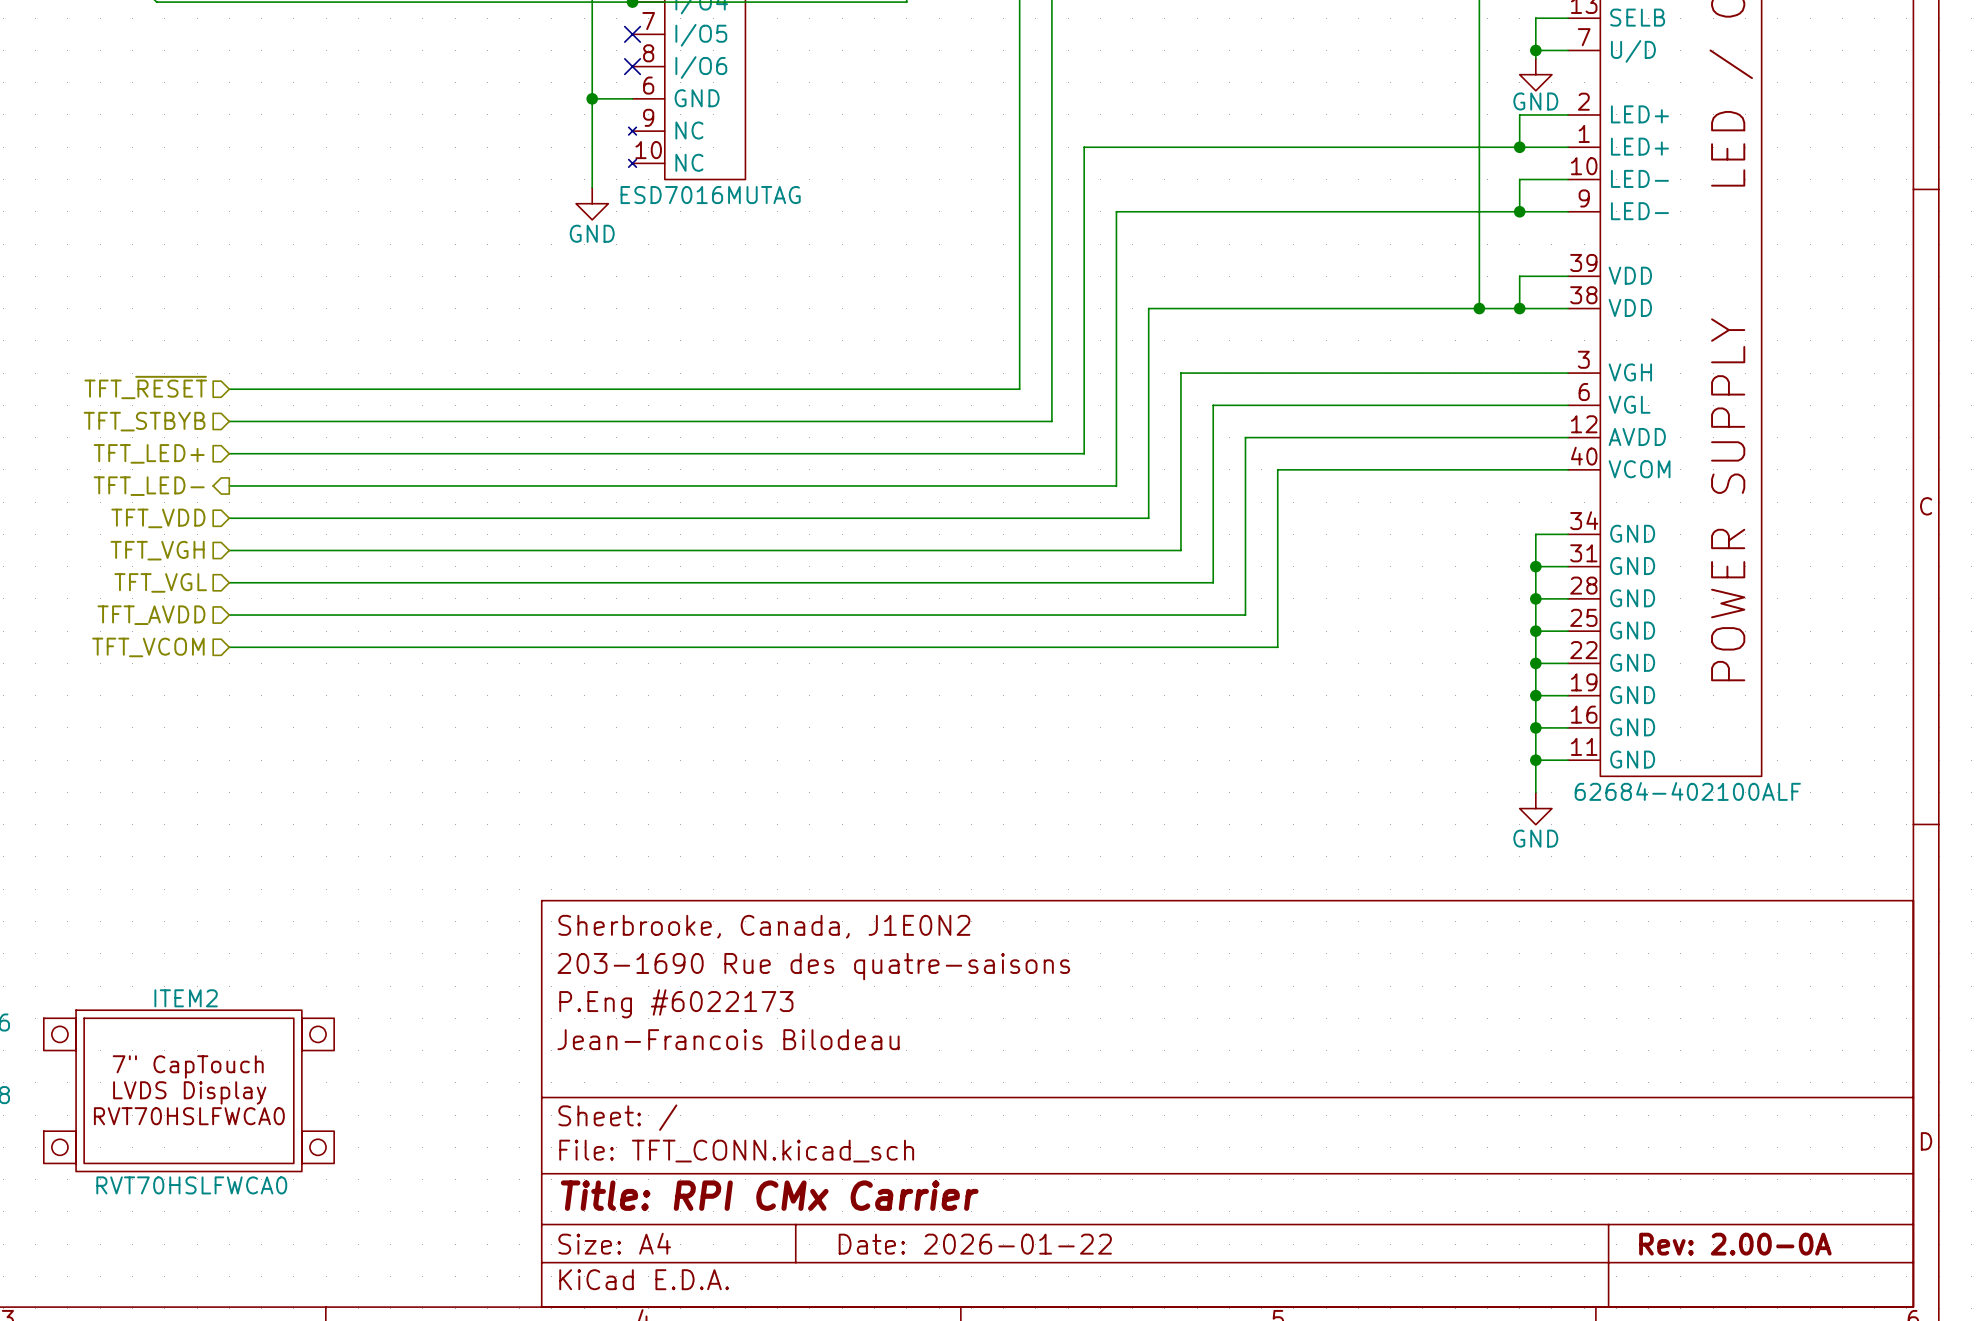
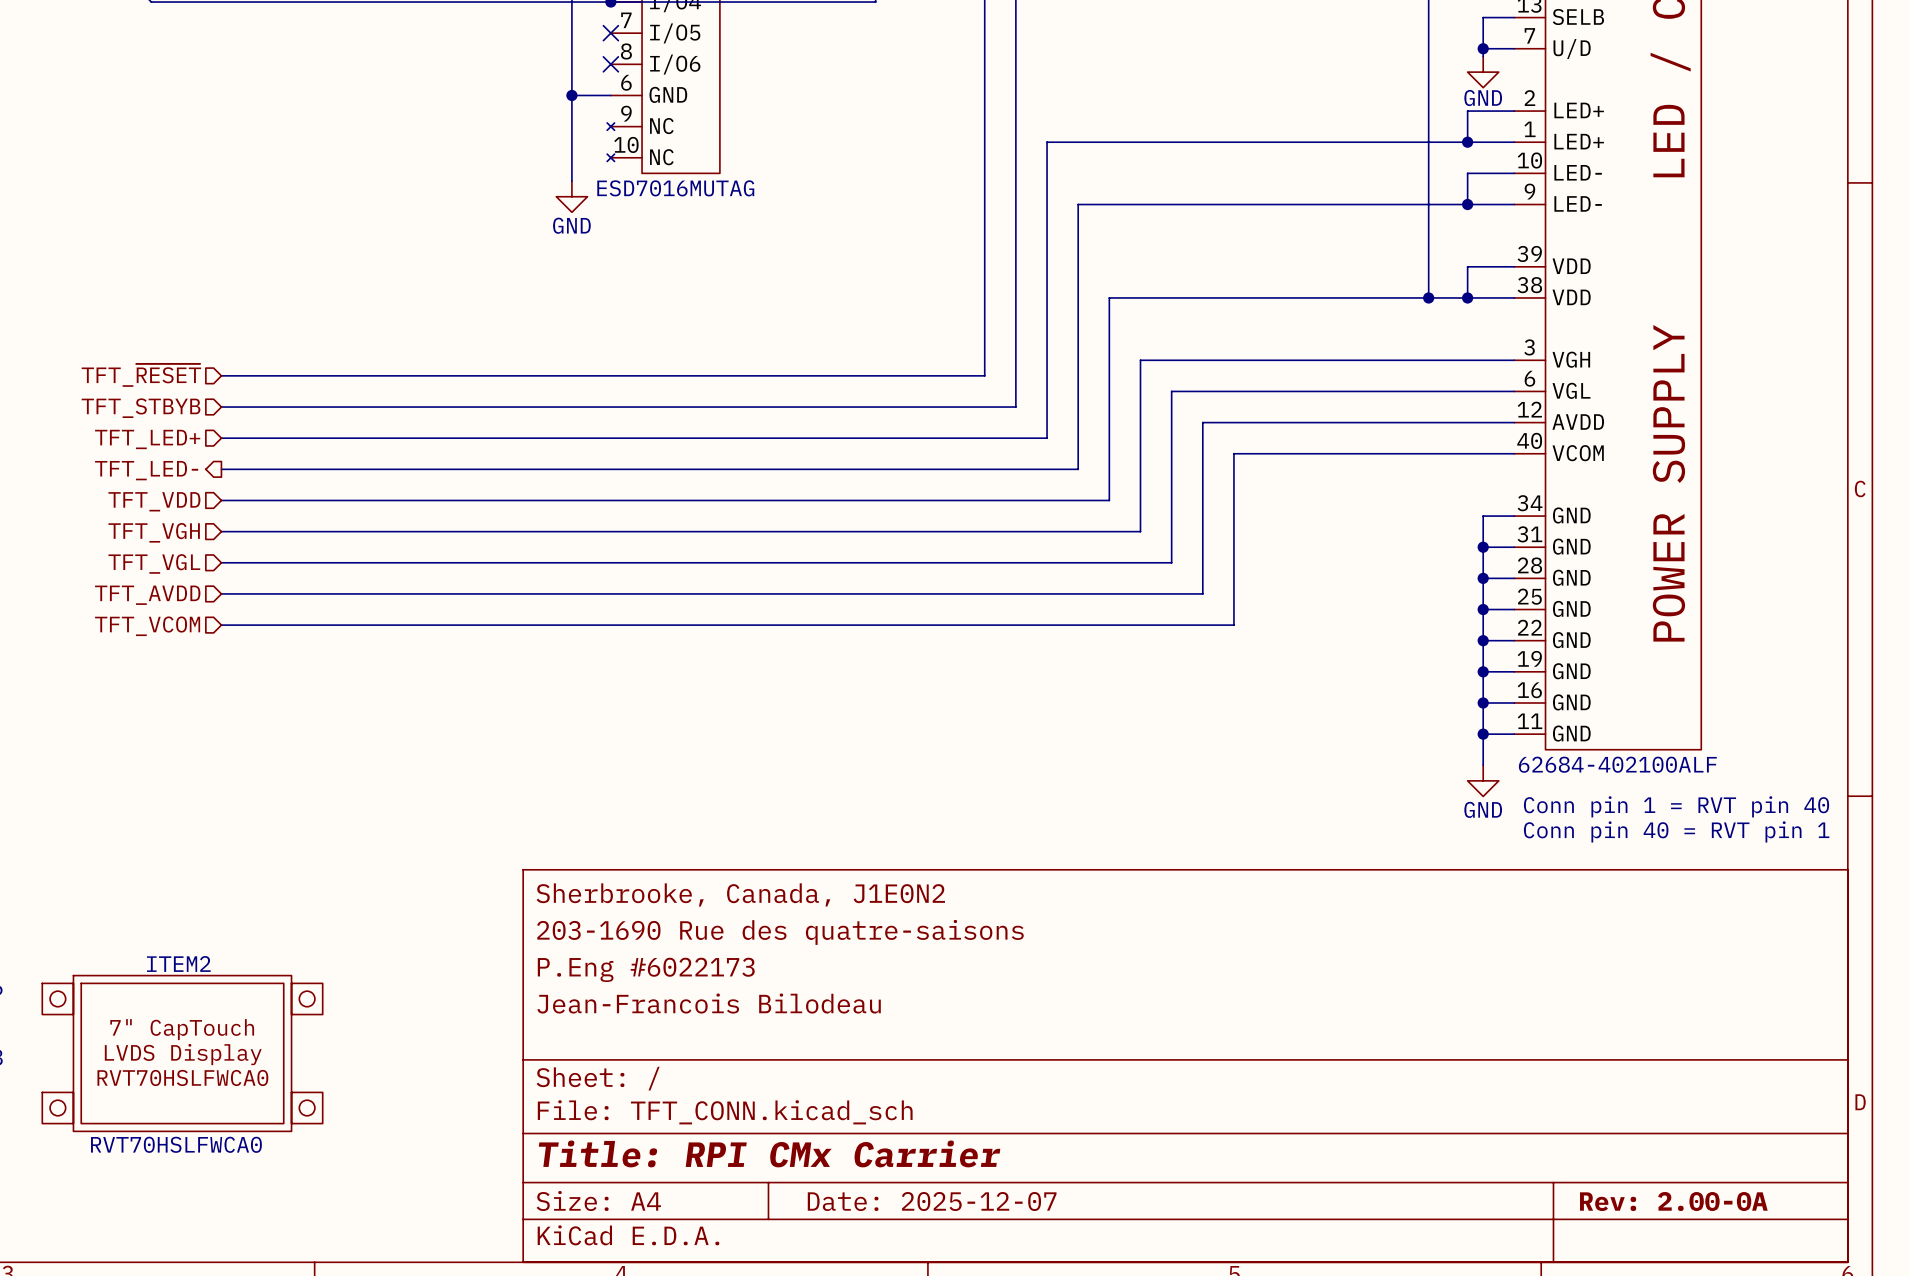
text: none -> Conn pin 1 = RVT pin 40 (1676, 806)
text: none -> Conn pin 40 = RVT pin 1 (1676, 831)
title block: Date: 2026-01-22 (975, 1244) -> Date: 2025-12-07 (932, 1201)

